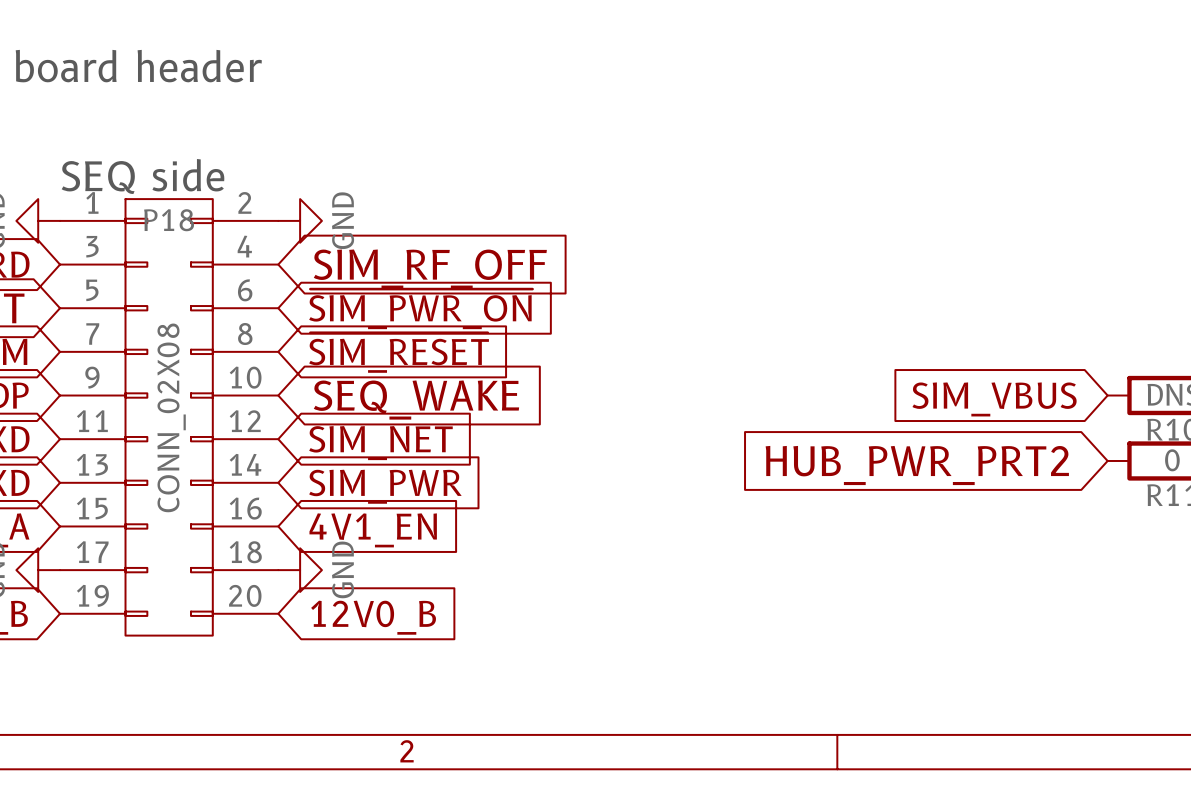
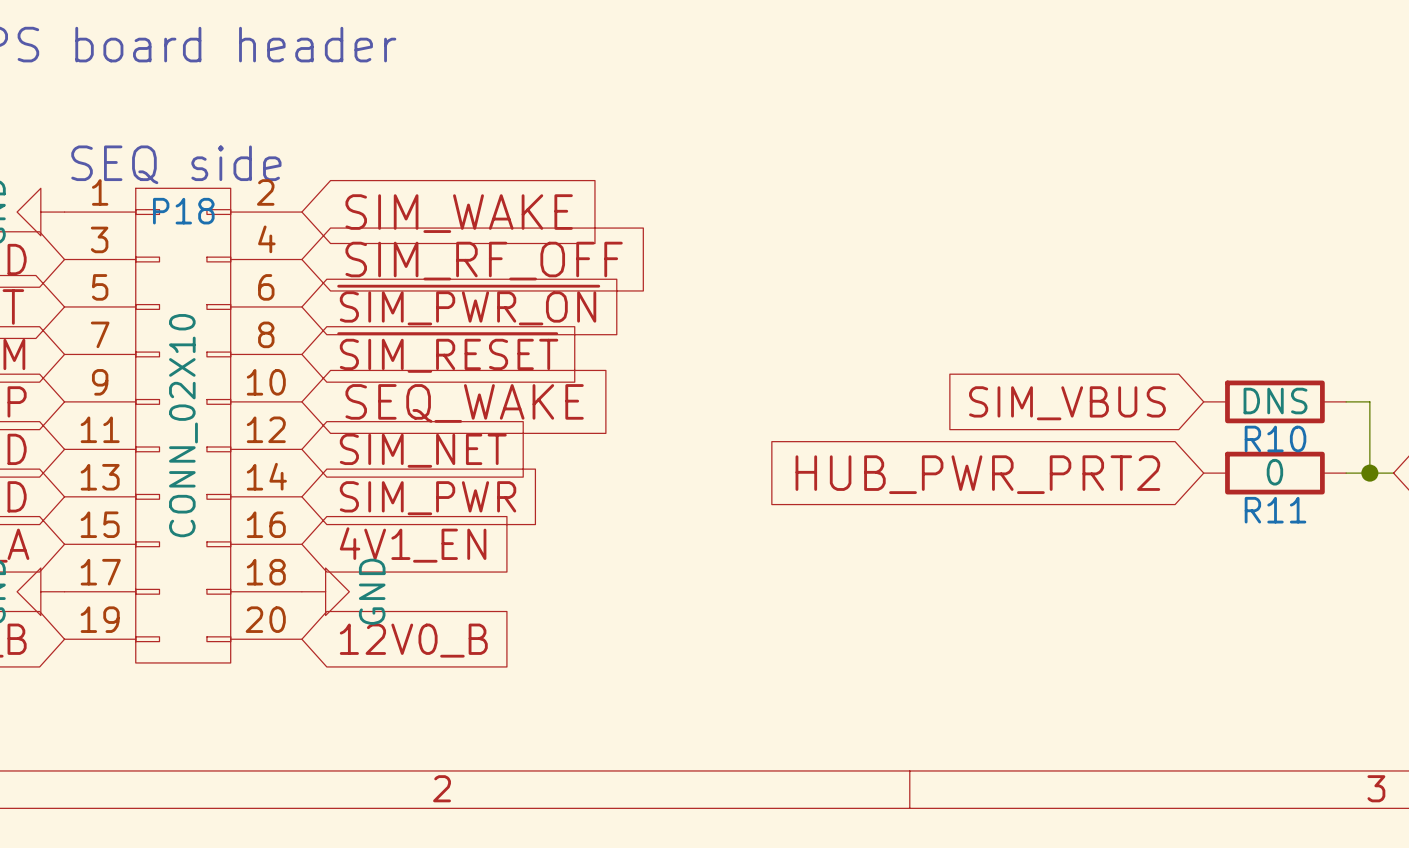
power symbol: GND (300, 220) -> none
global label: none -> SIM_WAKE (459, 213)
P18 value: CONN_02X08 (171, 417) -> CONN_02X10 (183, 425)

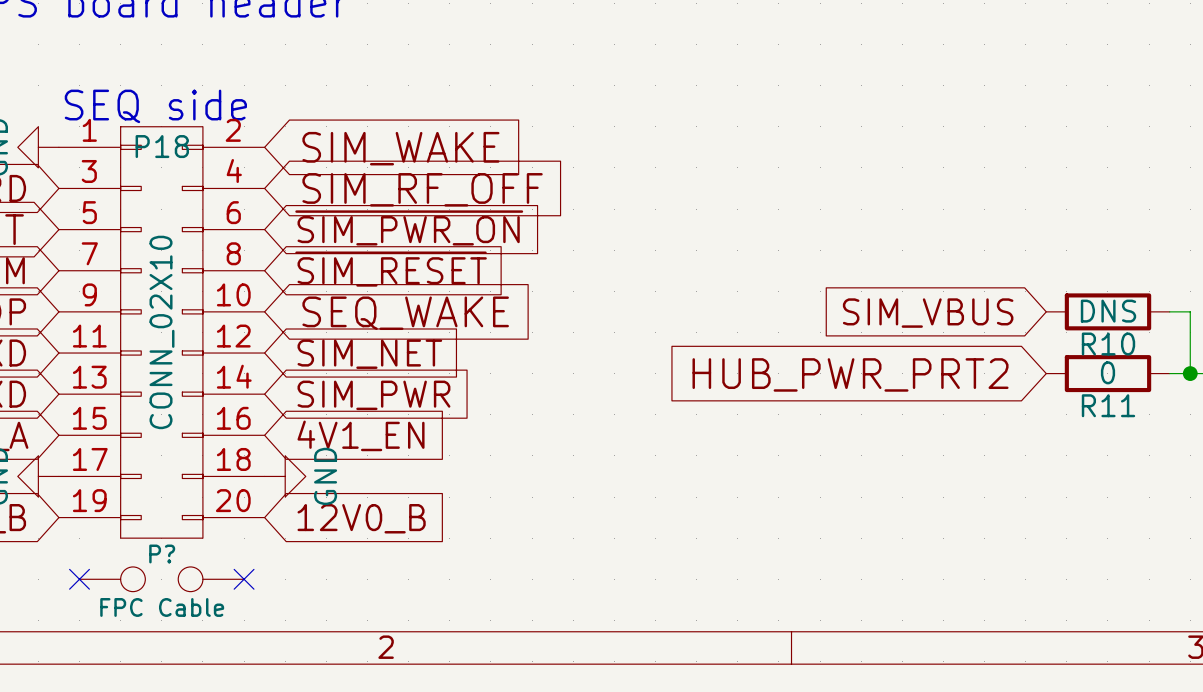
no-connect mark: none -> (79, 579)
P?: none -> FPC Cable (161, 579)
no-connect mark: none -> (244, 579)

